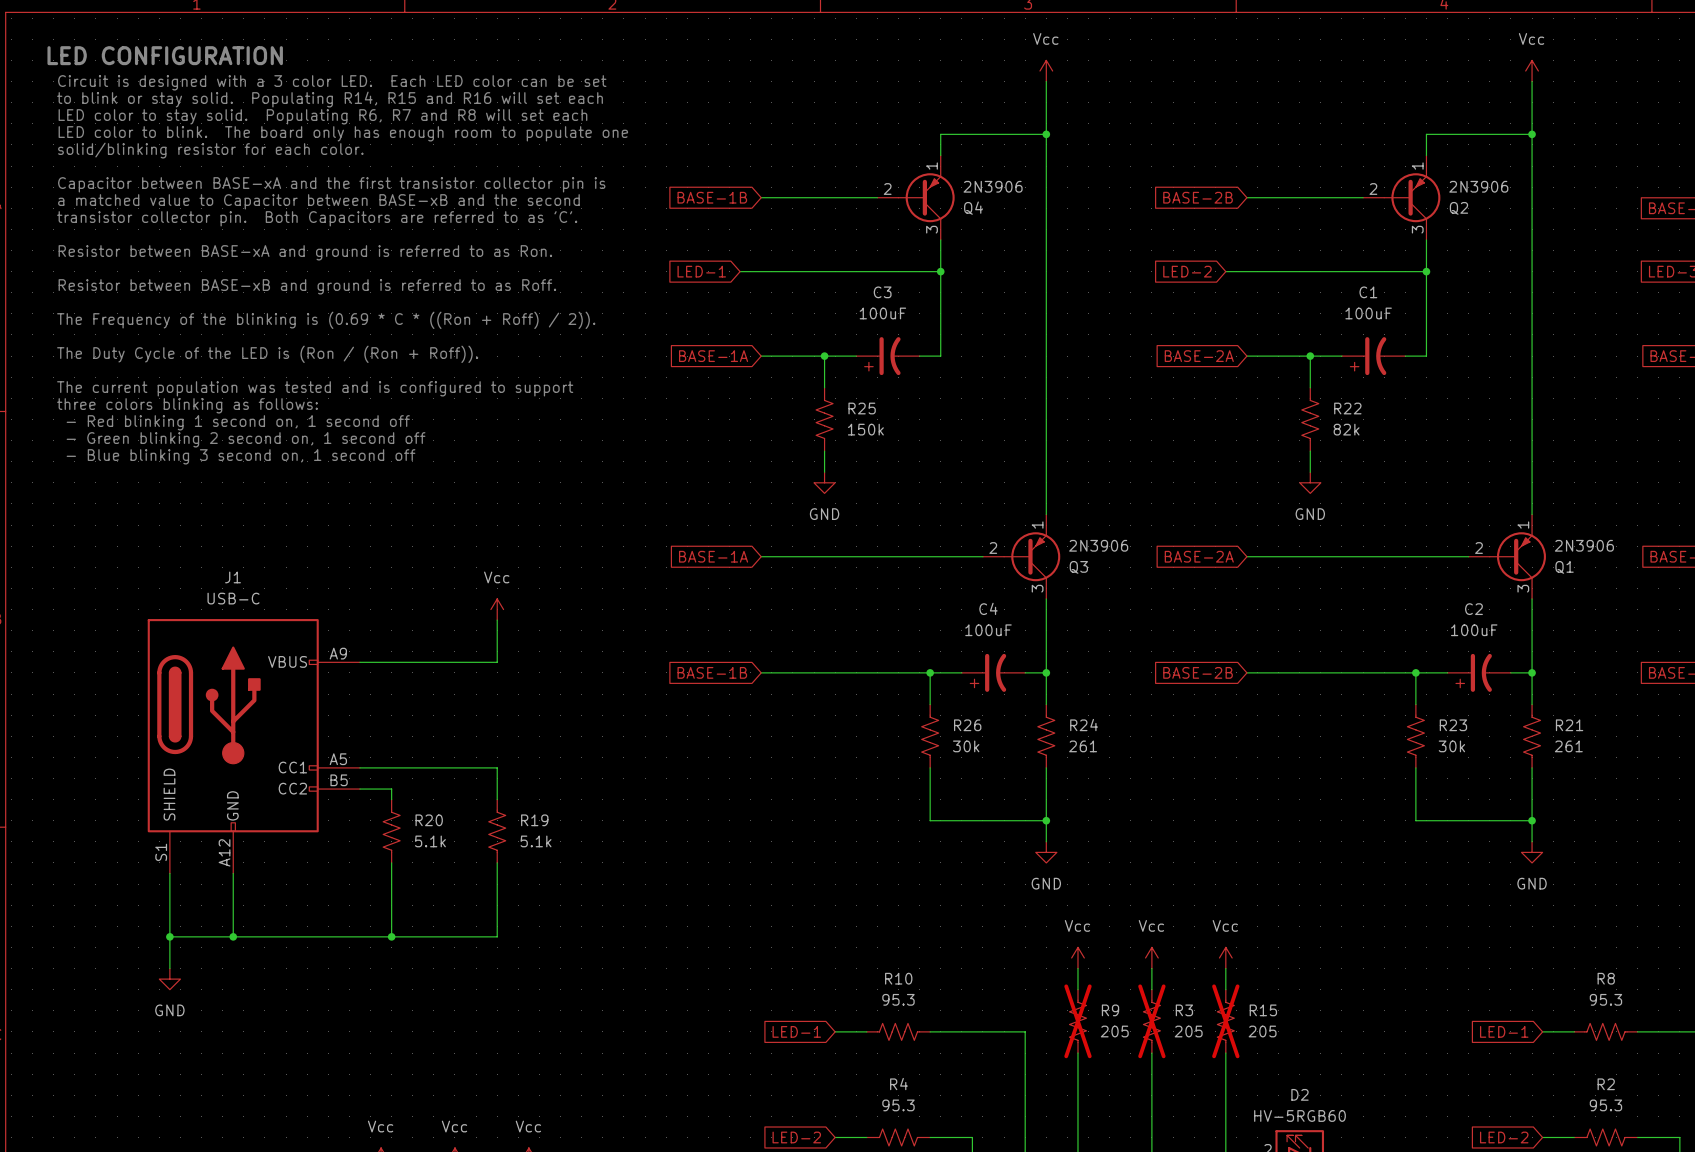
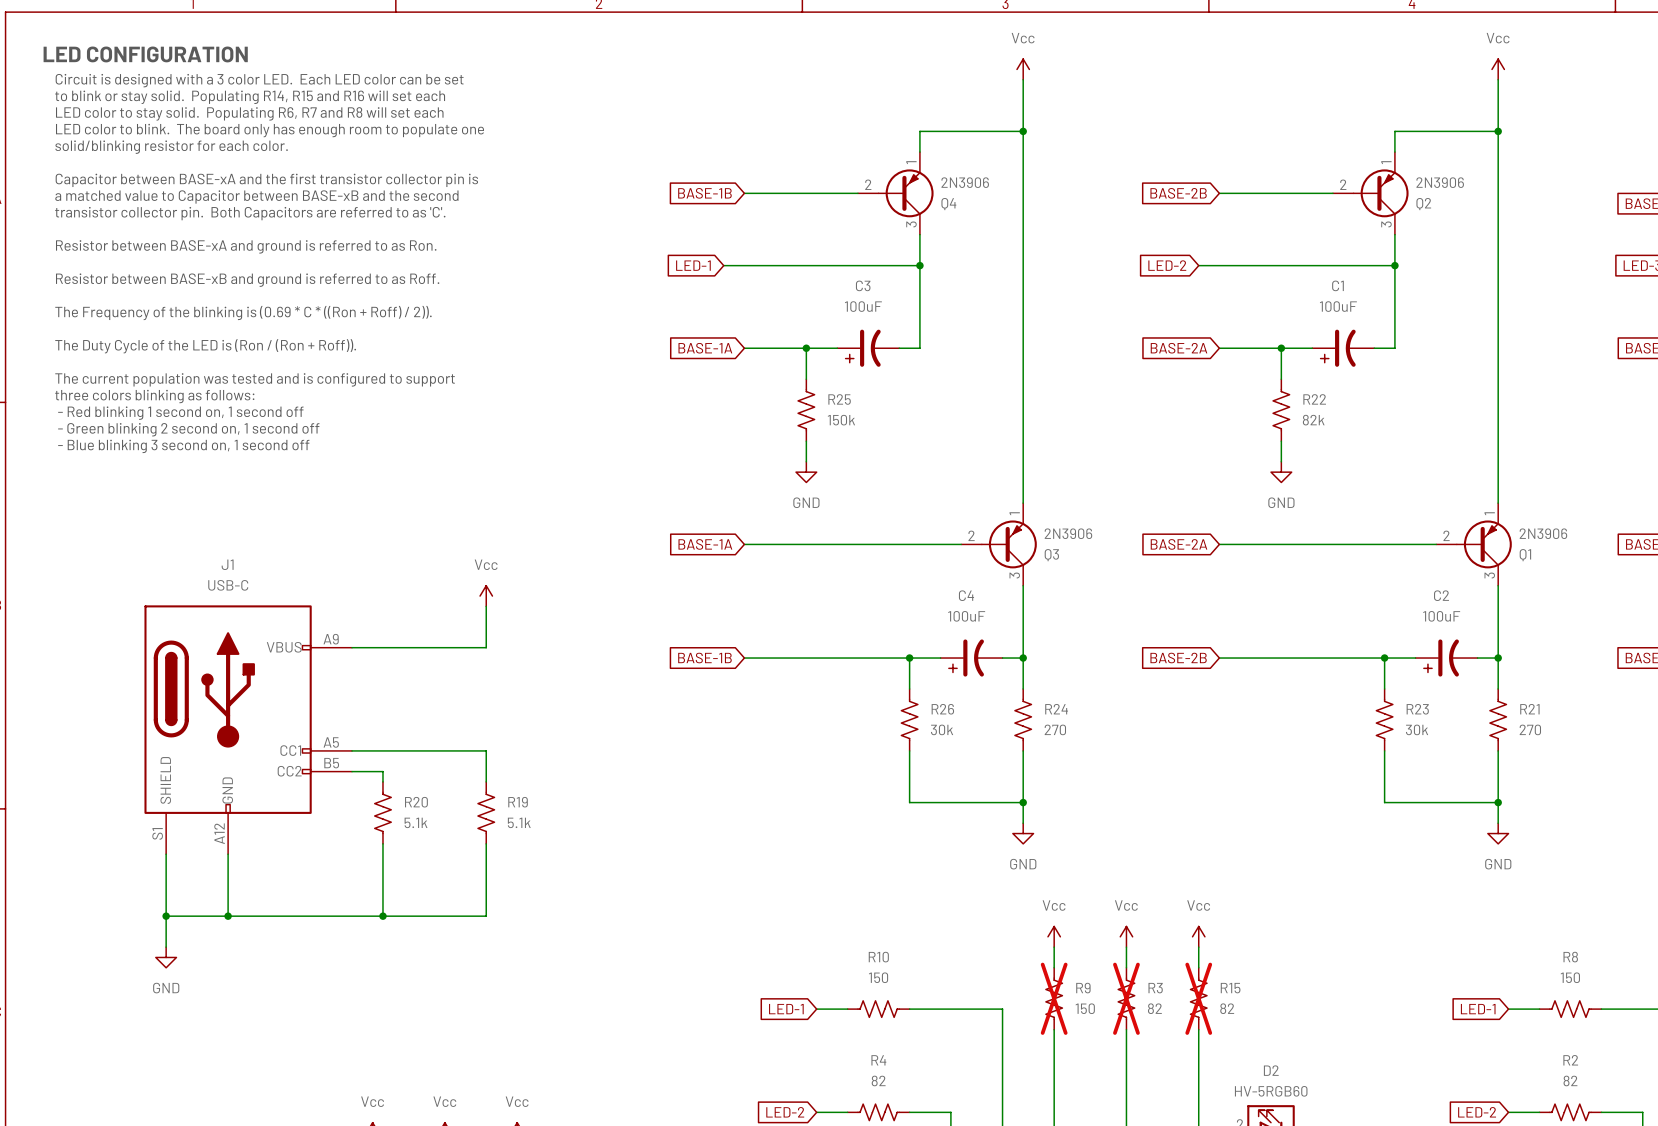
R24 value: 261 (1083, 746) -> 270 (1055, 729)
R21 value: 261 (1568, 746) -> 270 (1530, 729)
R10 value: 95.3 (898, 999) -> 150 (878, 977)
R8 value: 95.3 (1605, 999) -> 150 (1570, 977)
R9 value: 205 (1114, 1031) -> 150 (1085, 1008)
R3 value: 205 (1188, 1031) -> 82 (1154, 1008)
R15 value: 205 (1262, 1031) -> 82 (1227, 1008)
R4 value: 95.3 (898, 1105) -> 82 (878, 1080)
R2 value: 95.3 (1605, 1105) -> 82 (1570, 1080)

